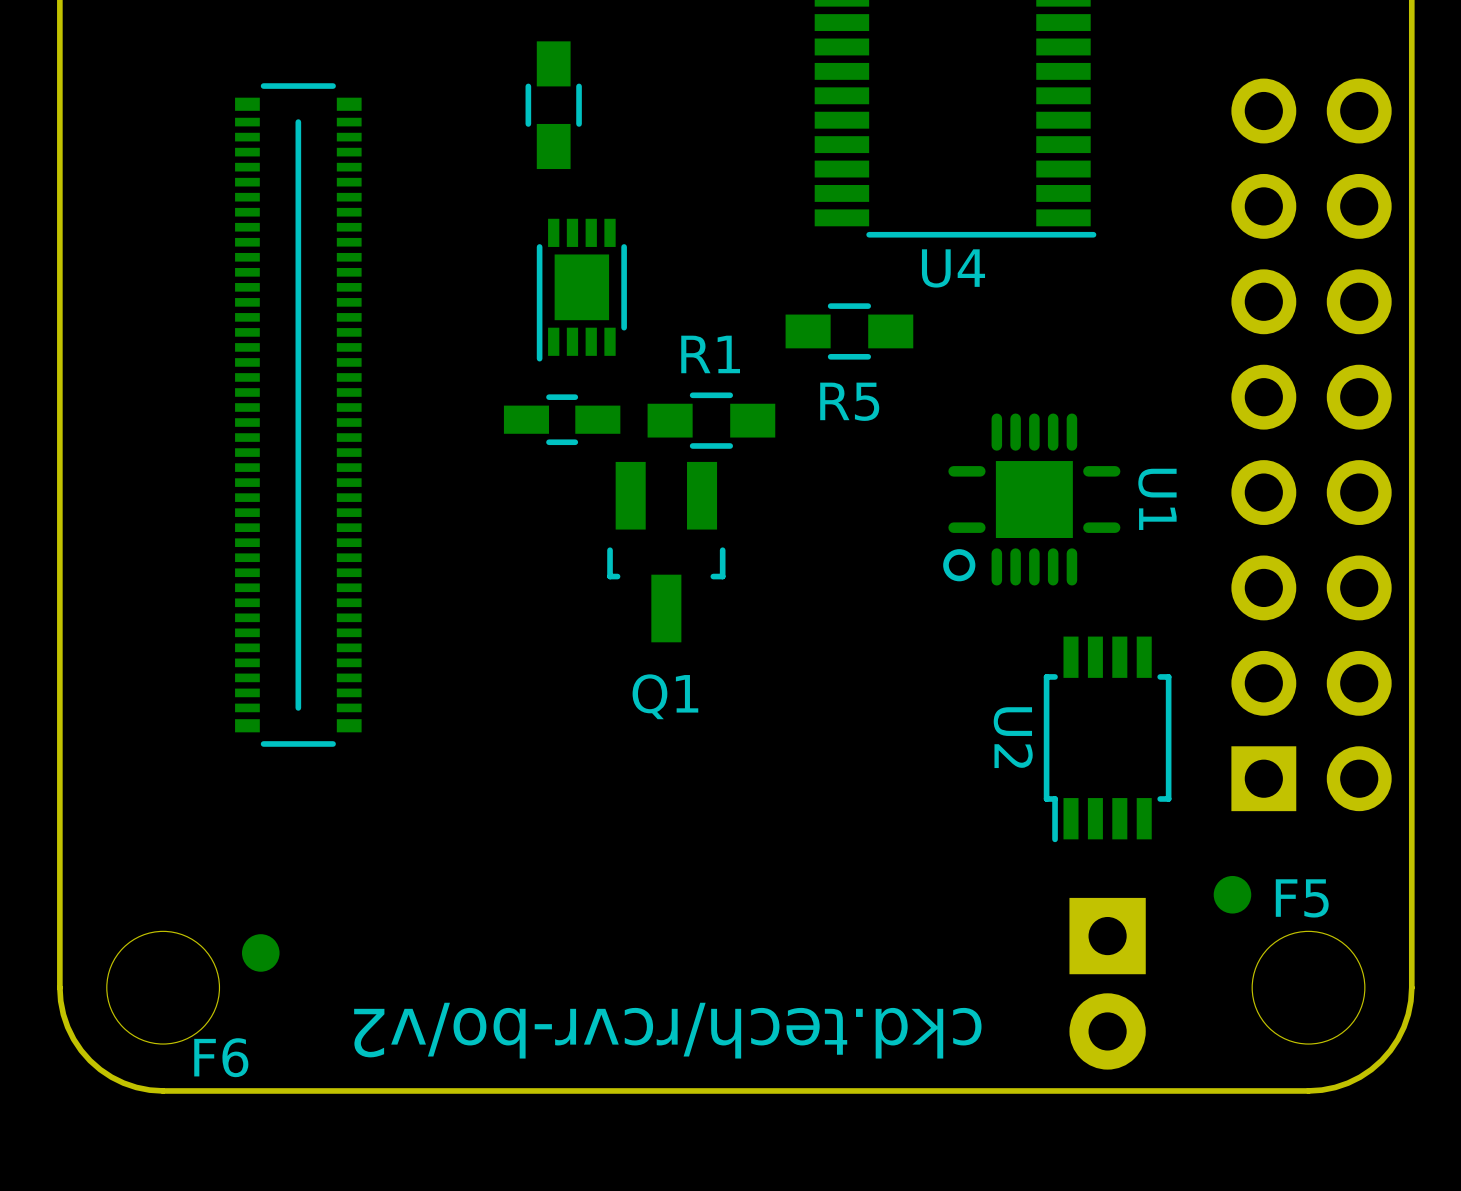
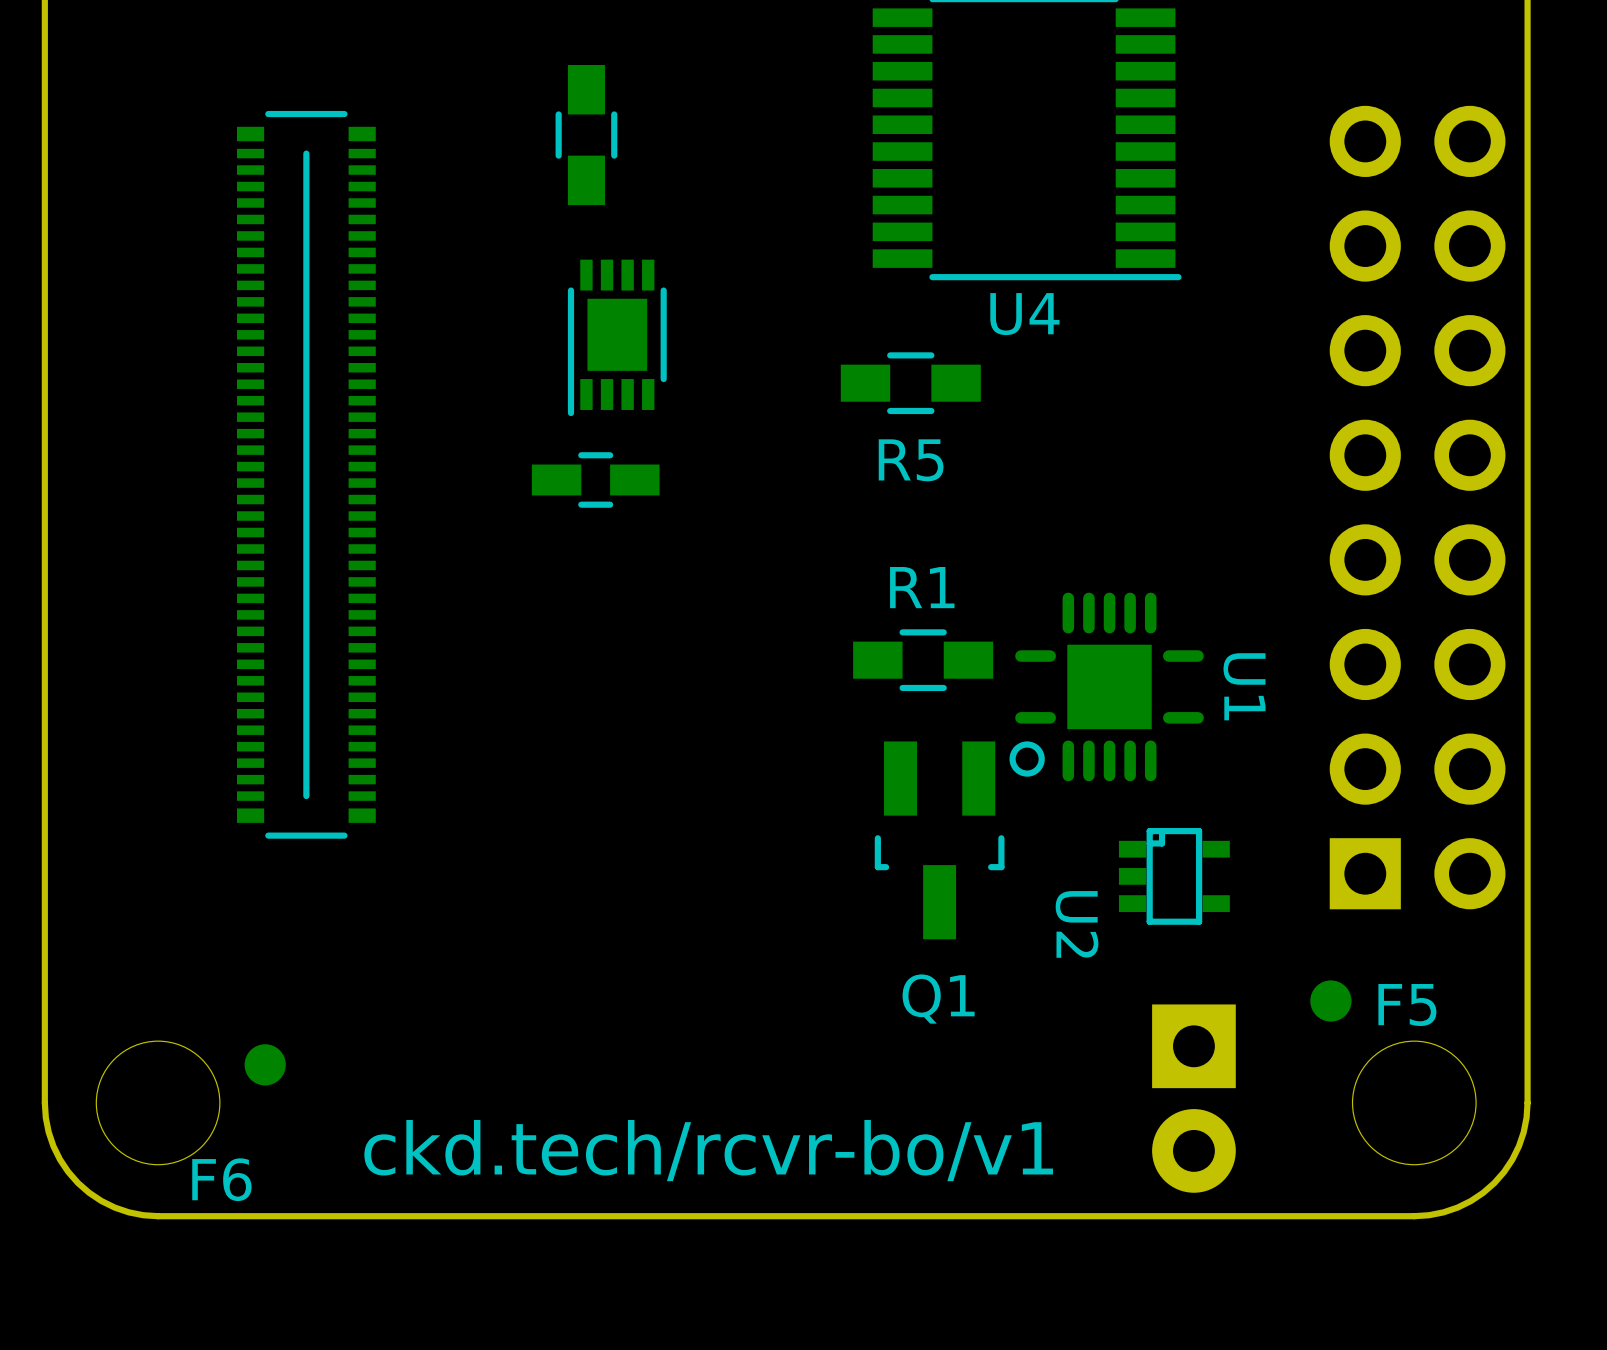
R1 position: (711, 420) -> (923, 660)
U1 position: (1031, 499) -> (1106, 686)
Q1 position: (666, 552) -> (939, 840)
U2 footprint: [1043, 636, 1172, 843] -> [1118, 828, 1230, 925]
text: ckd.tech/rcvr-bo/v2 (667, 1030) -> ckd.tech/rcvr-bo/v1 (708, 1150)

